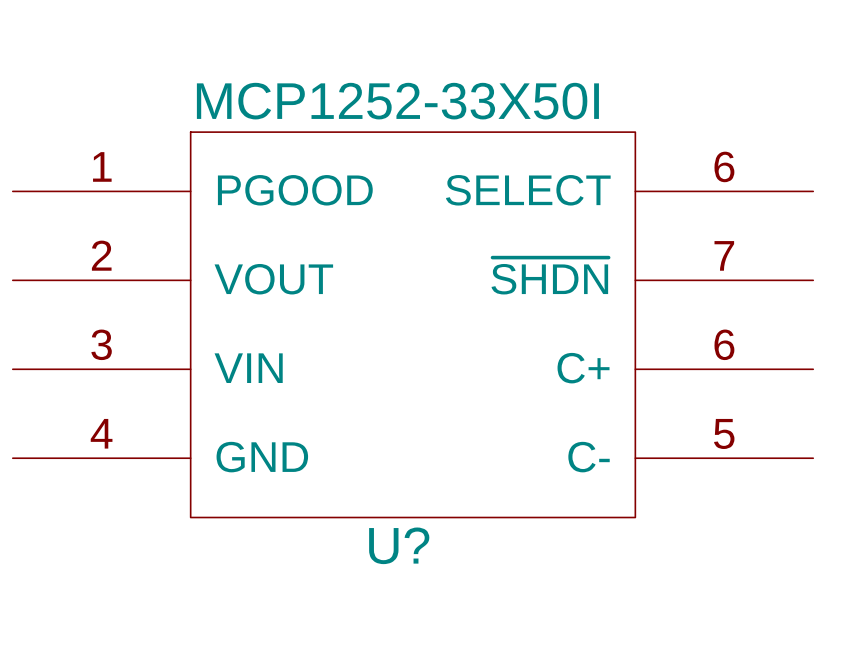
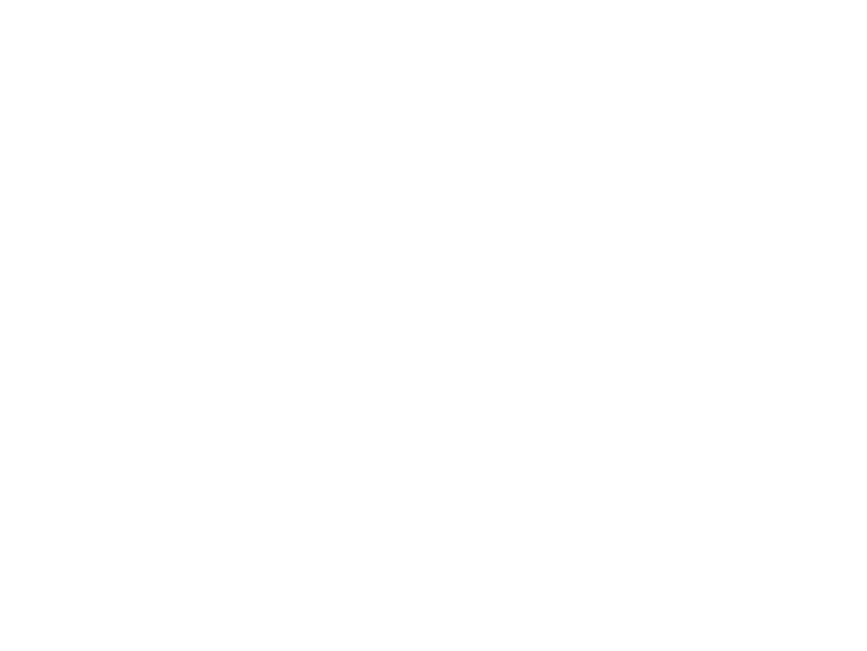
U?: MCP1252-33X50I (413, 324) -> none

